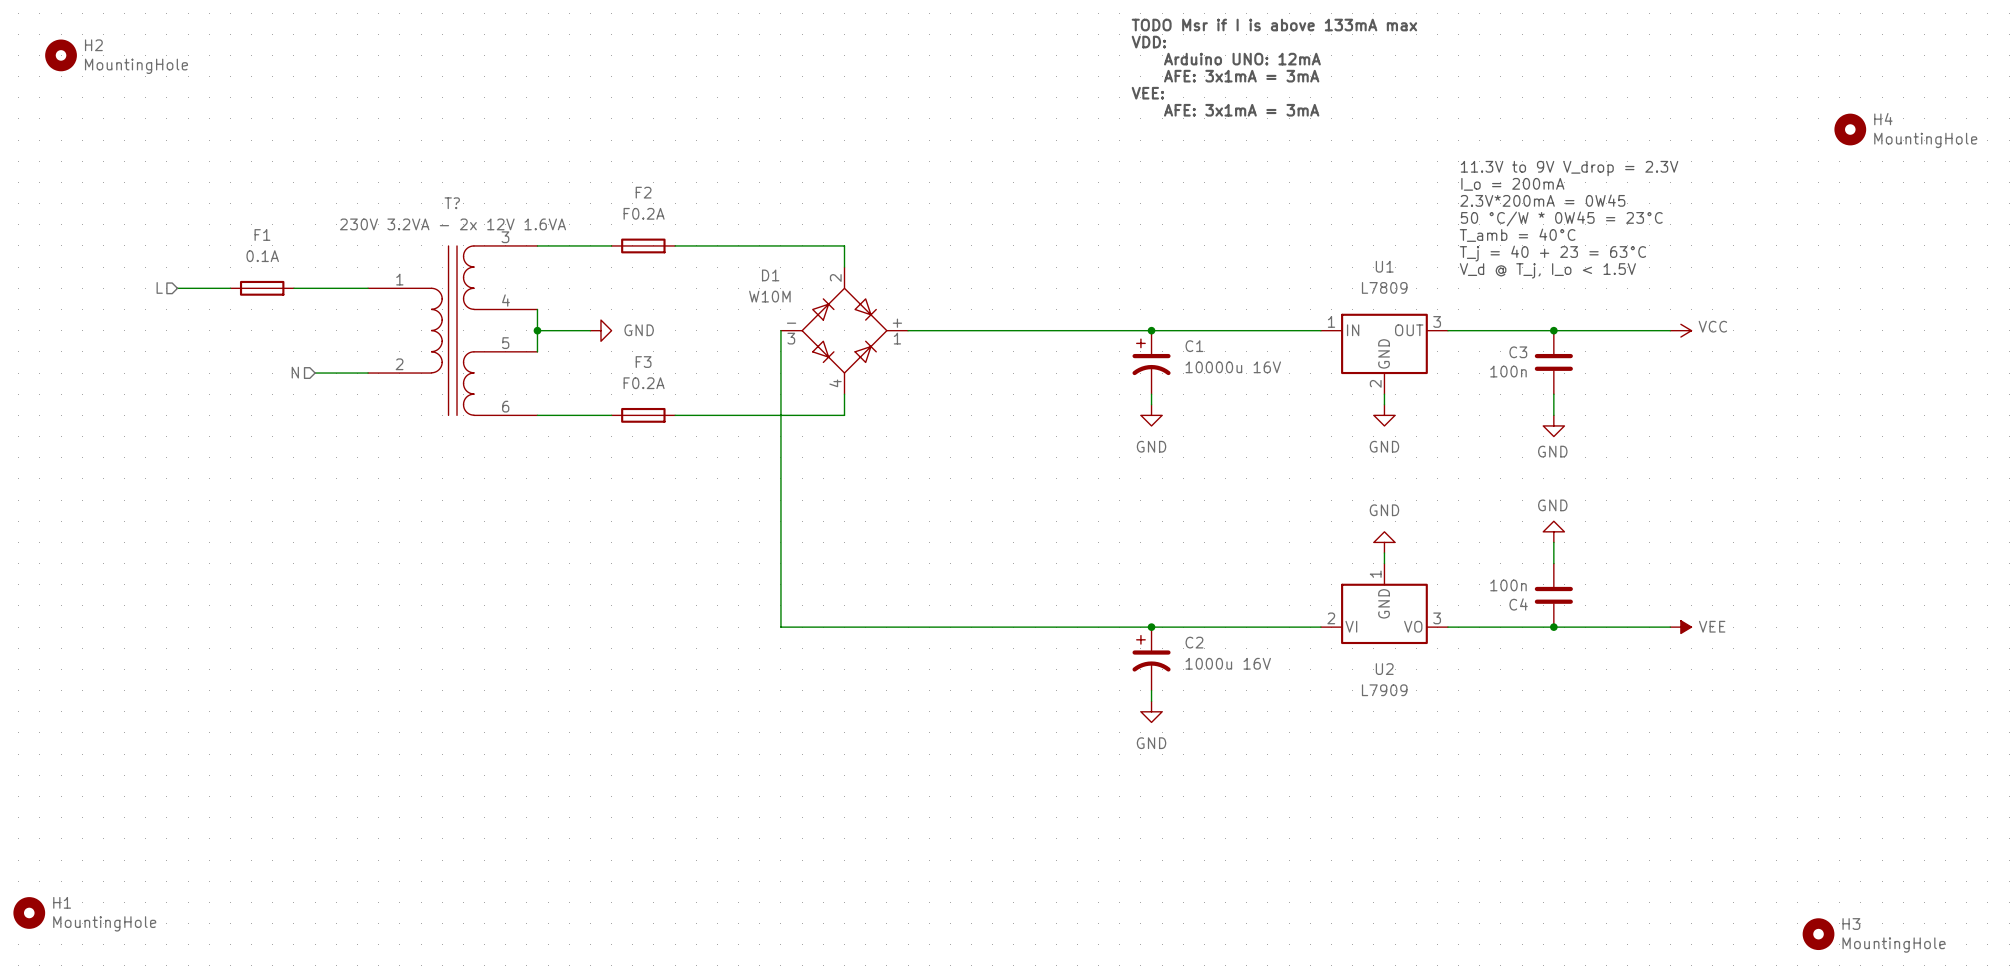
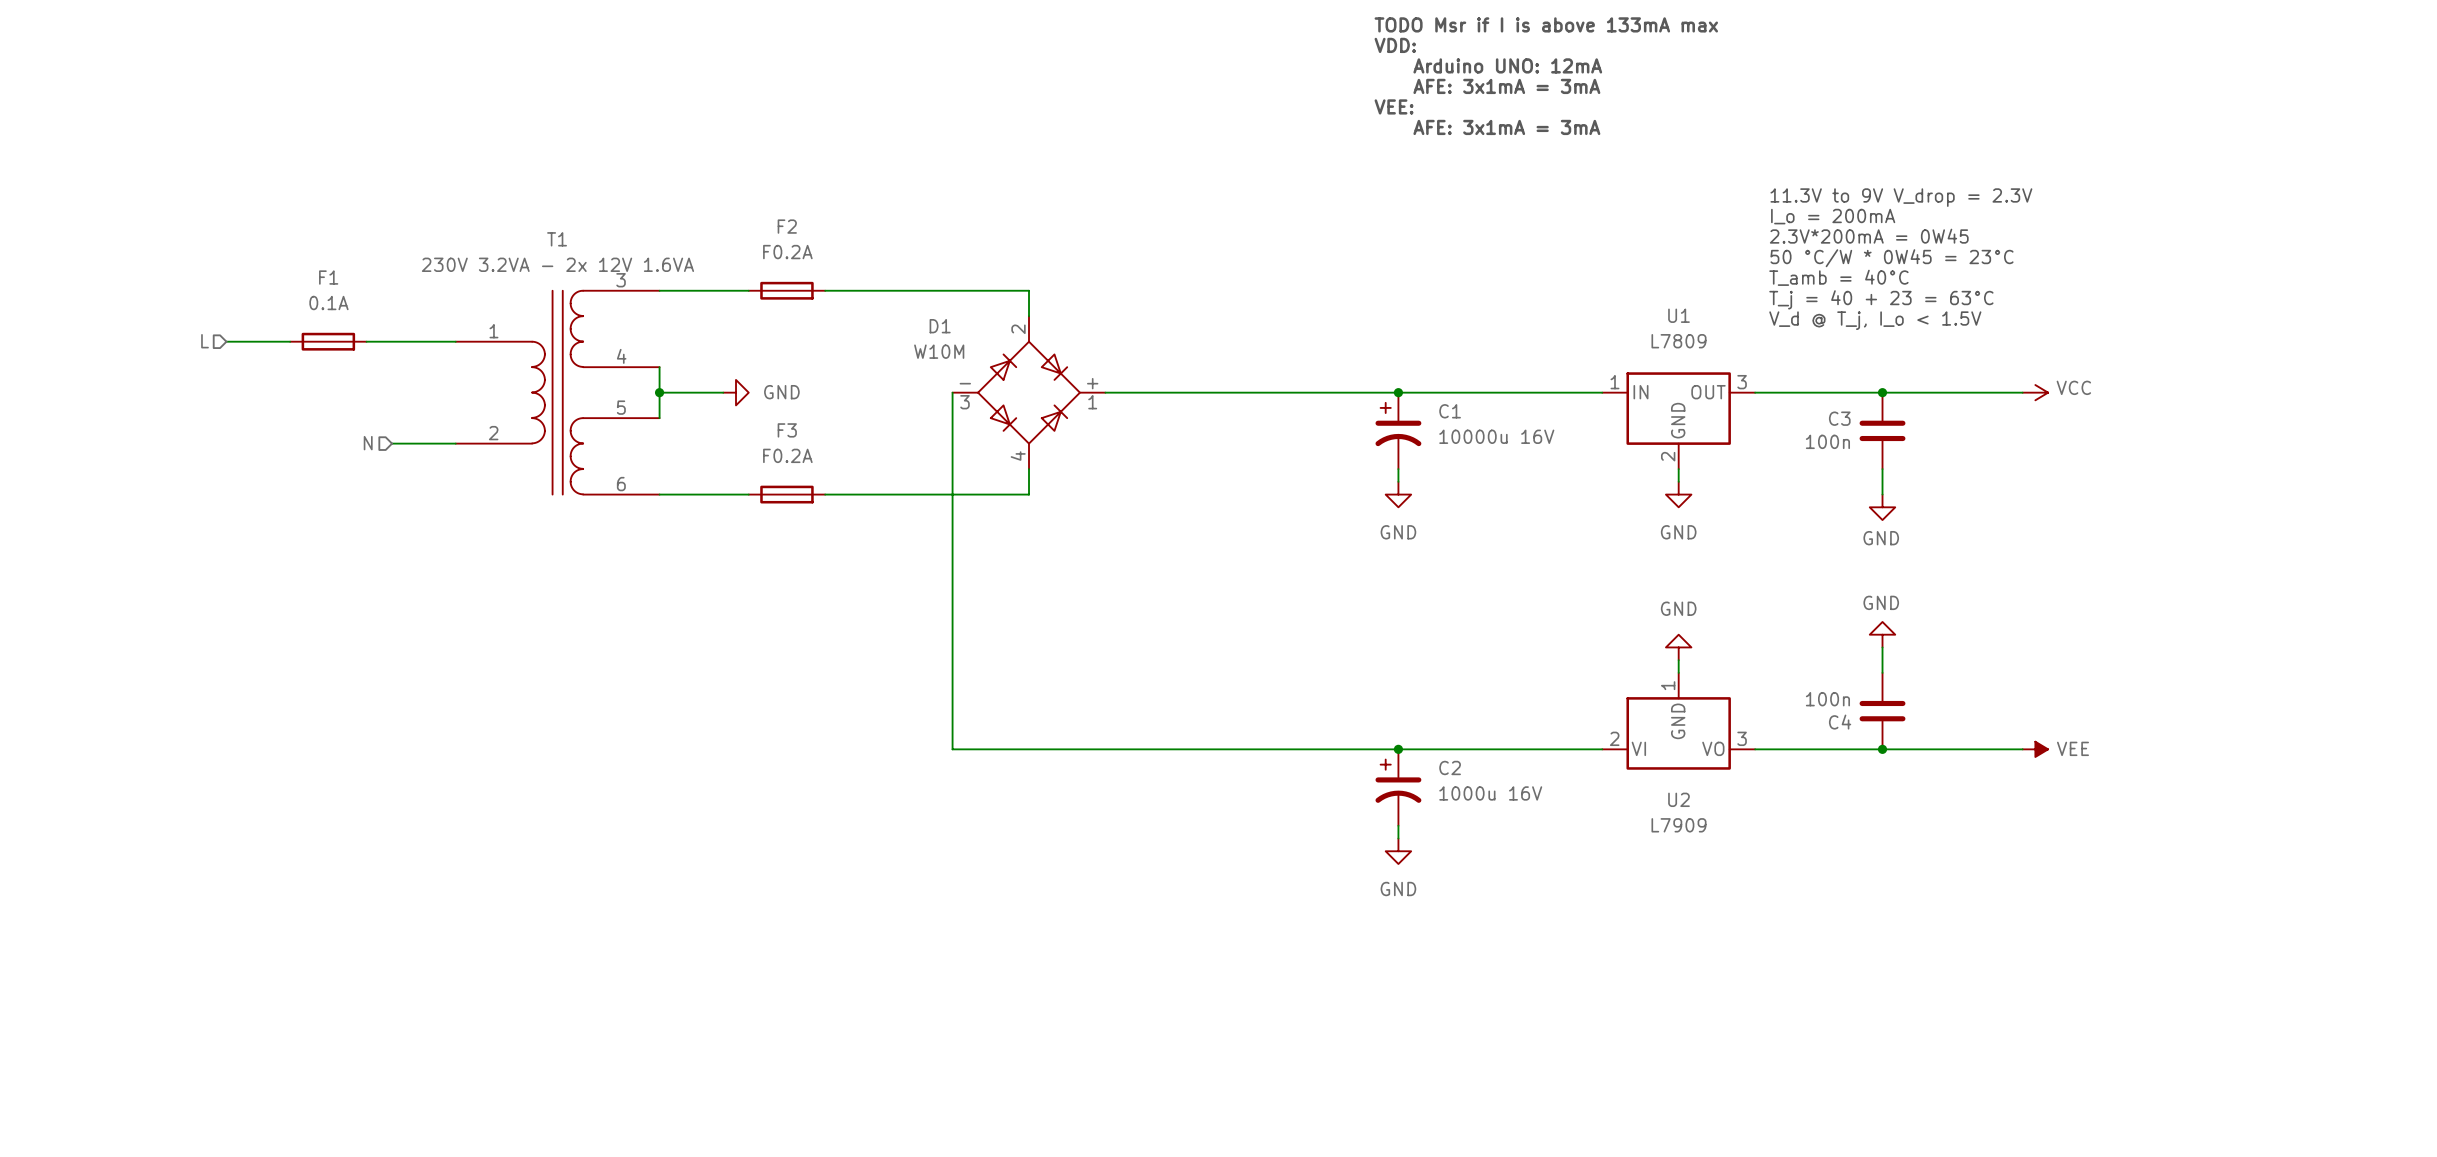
H2: MountingHole (61, 55) -> none
H4: MountingHole (1850, 129) -> none
T? name: T? (452, 203) -> T1 (557, 239)
H1: MountingHole (29, 912) -> none
H3: MountingHole (1818, 934) -> none

